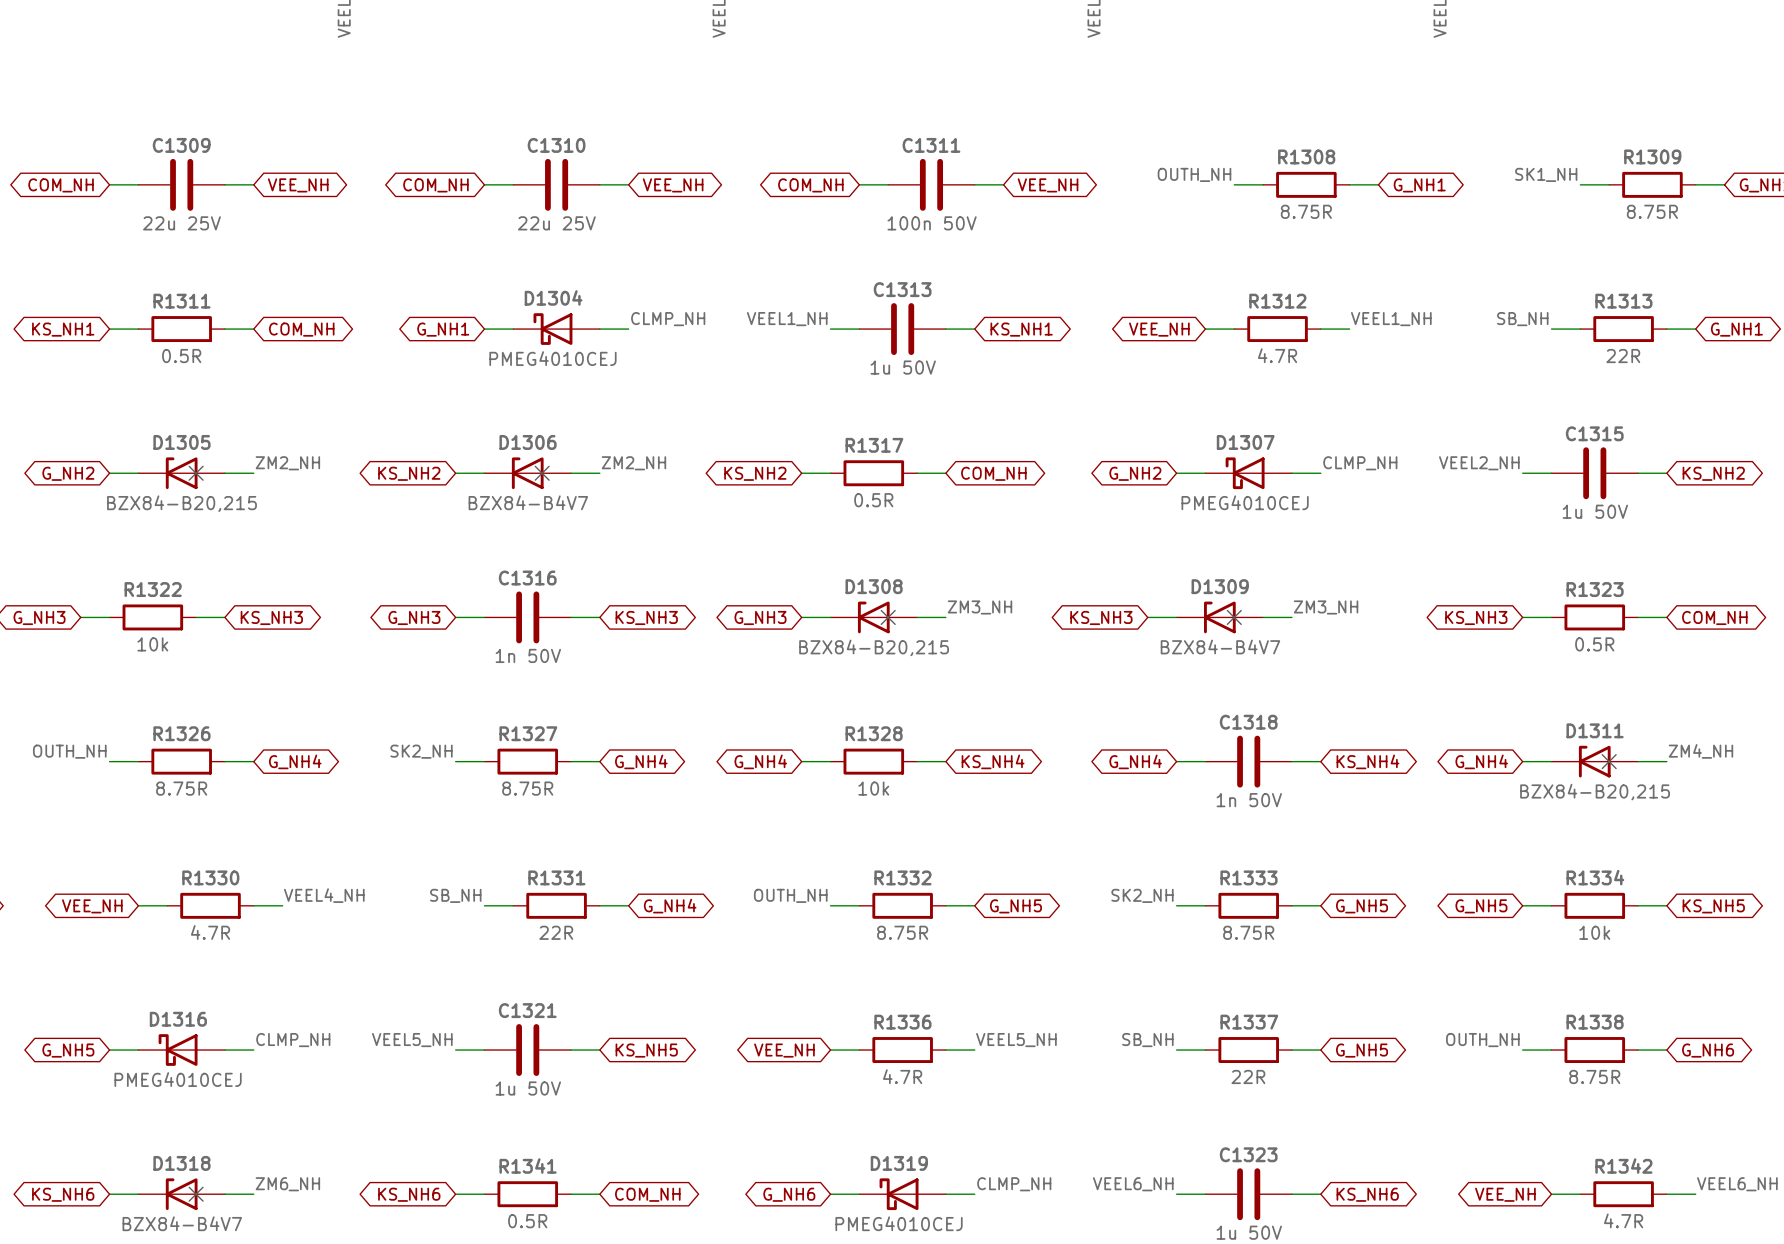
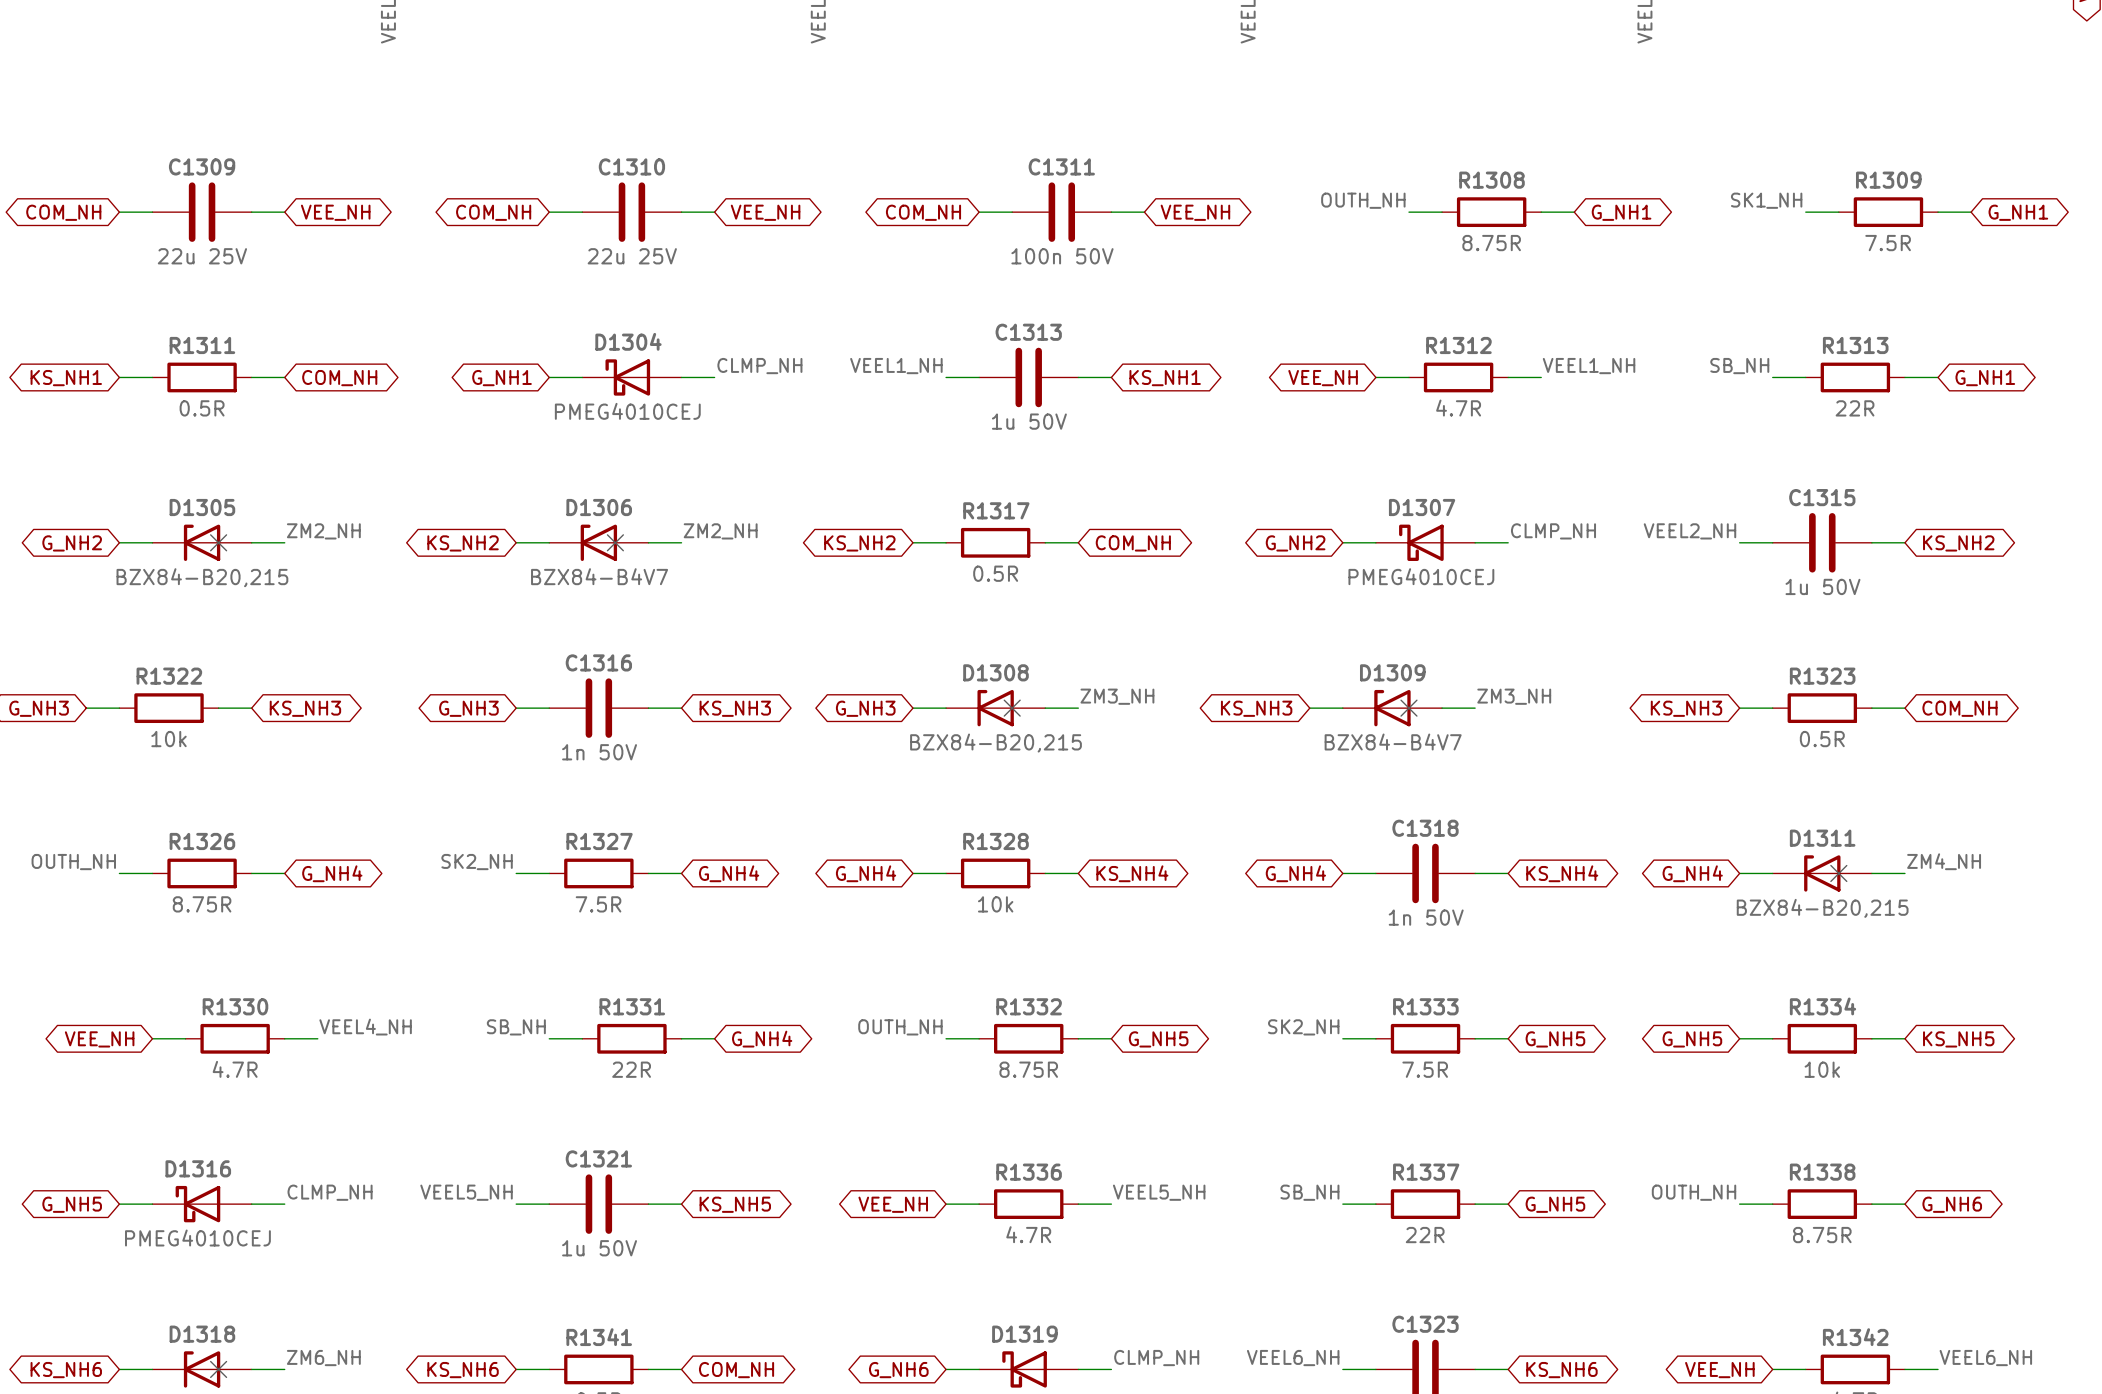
R1309 value: 8.75R (1652, 211) -> 7.5R (1888, 243)
R1327 value: 8.75R (527, 788) -> 7.5R (598, 904)
R1333 value: 8.75R (1248, 932) -> 7.5R (1425, 1069)

